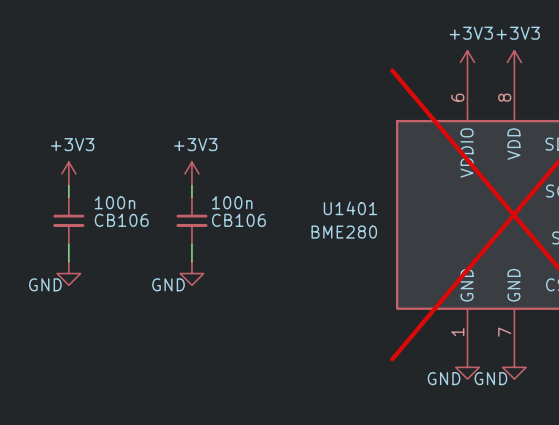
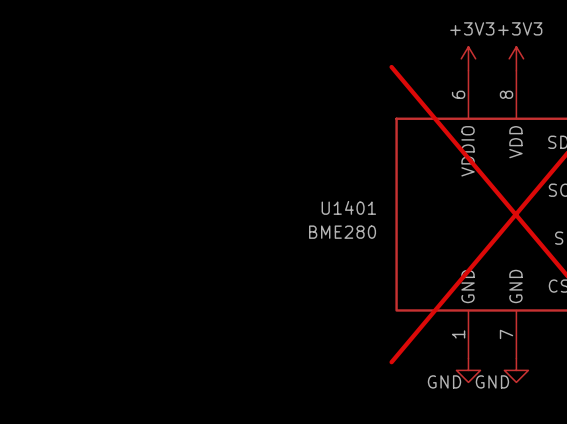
power symbol: +3V3 (68, 173) -> none
power symbol: +3V3 (191, 173) -> none
wire: (68, 185) (68, 197) -> none
wire: (191, 185) (191, 197) -> none
CB106: 100n (68, 220) -> none
CB106: 100n (191, 220) -> none
wire: (68, 244) (68, 261) -> none
wire: (191, 244) (191, 261) -> none
power symbol: GND (68, 273) -> none
power symbol: GND (191, 273) -> none

